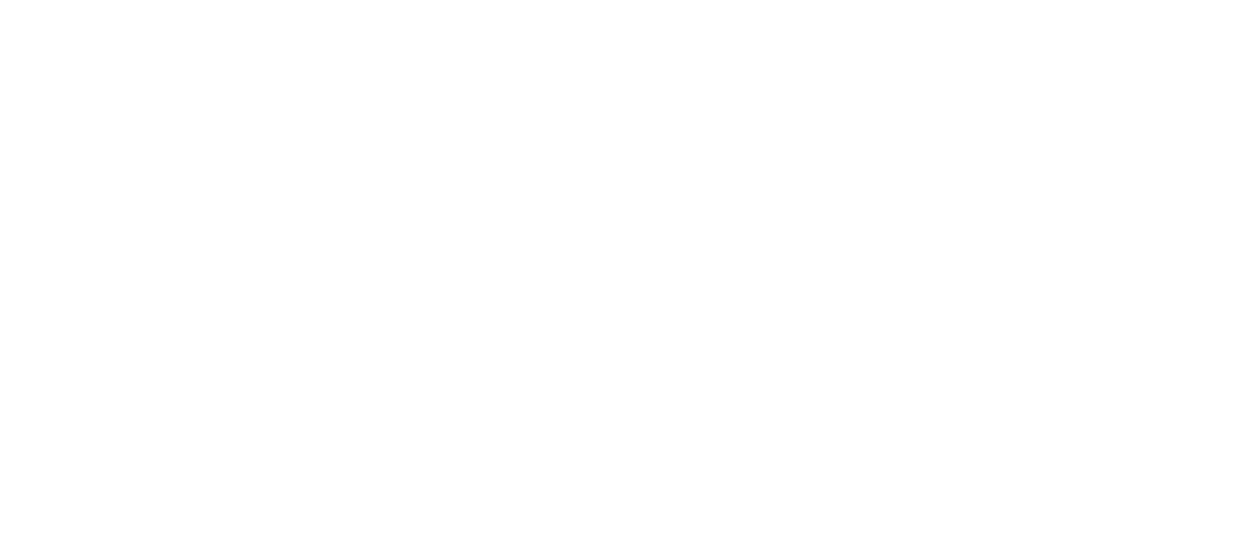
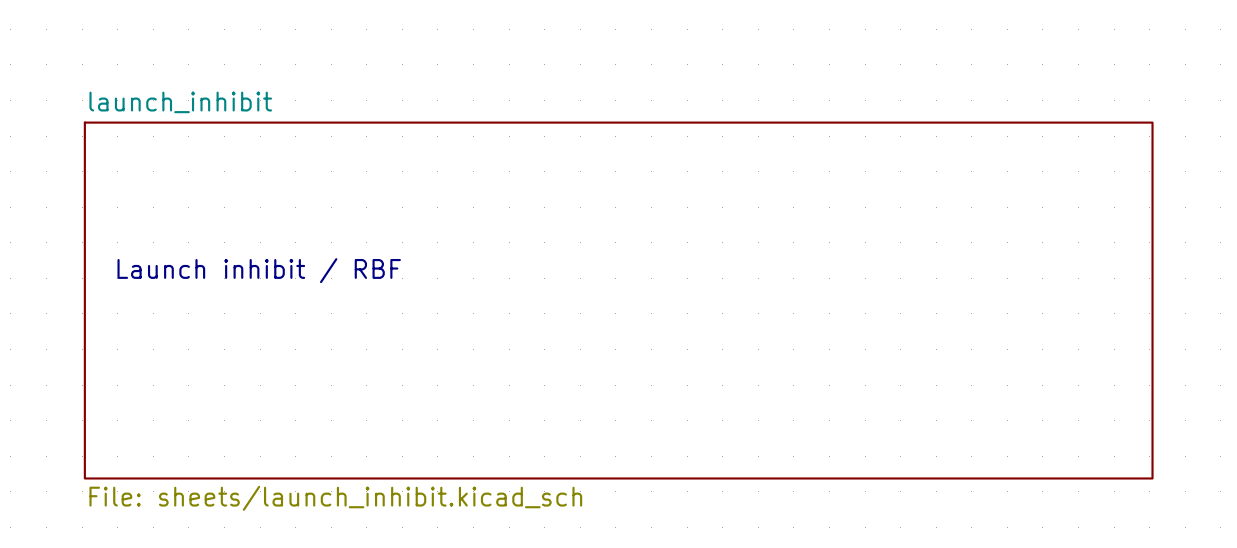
text: none -> Launch inhibit / RBF (259, 270)
sheet launch_inhibit: none -> File: sheets/launch_inhibit.kicad_sch (618, 300)

